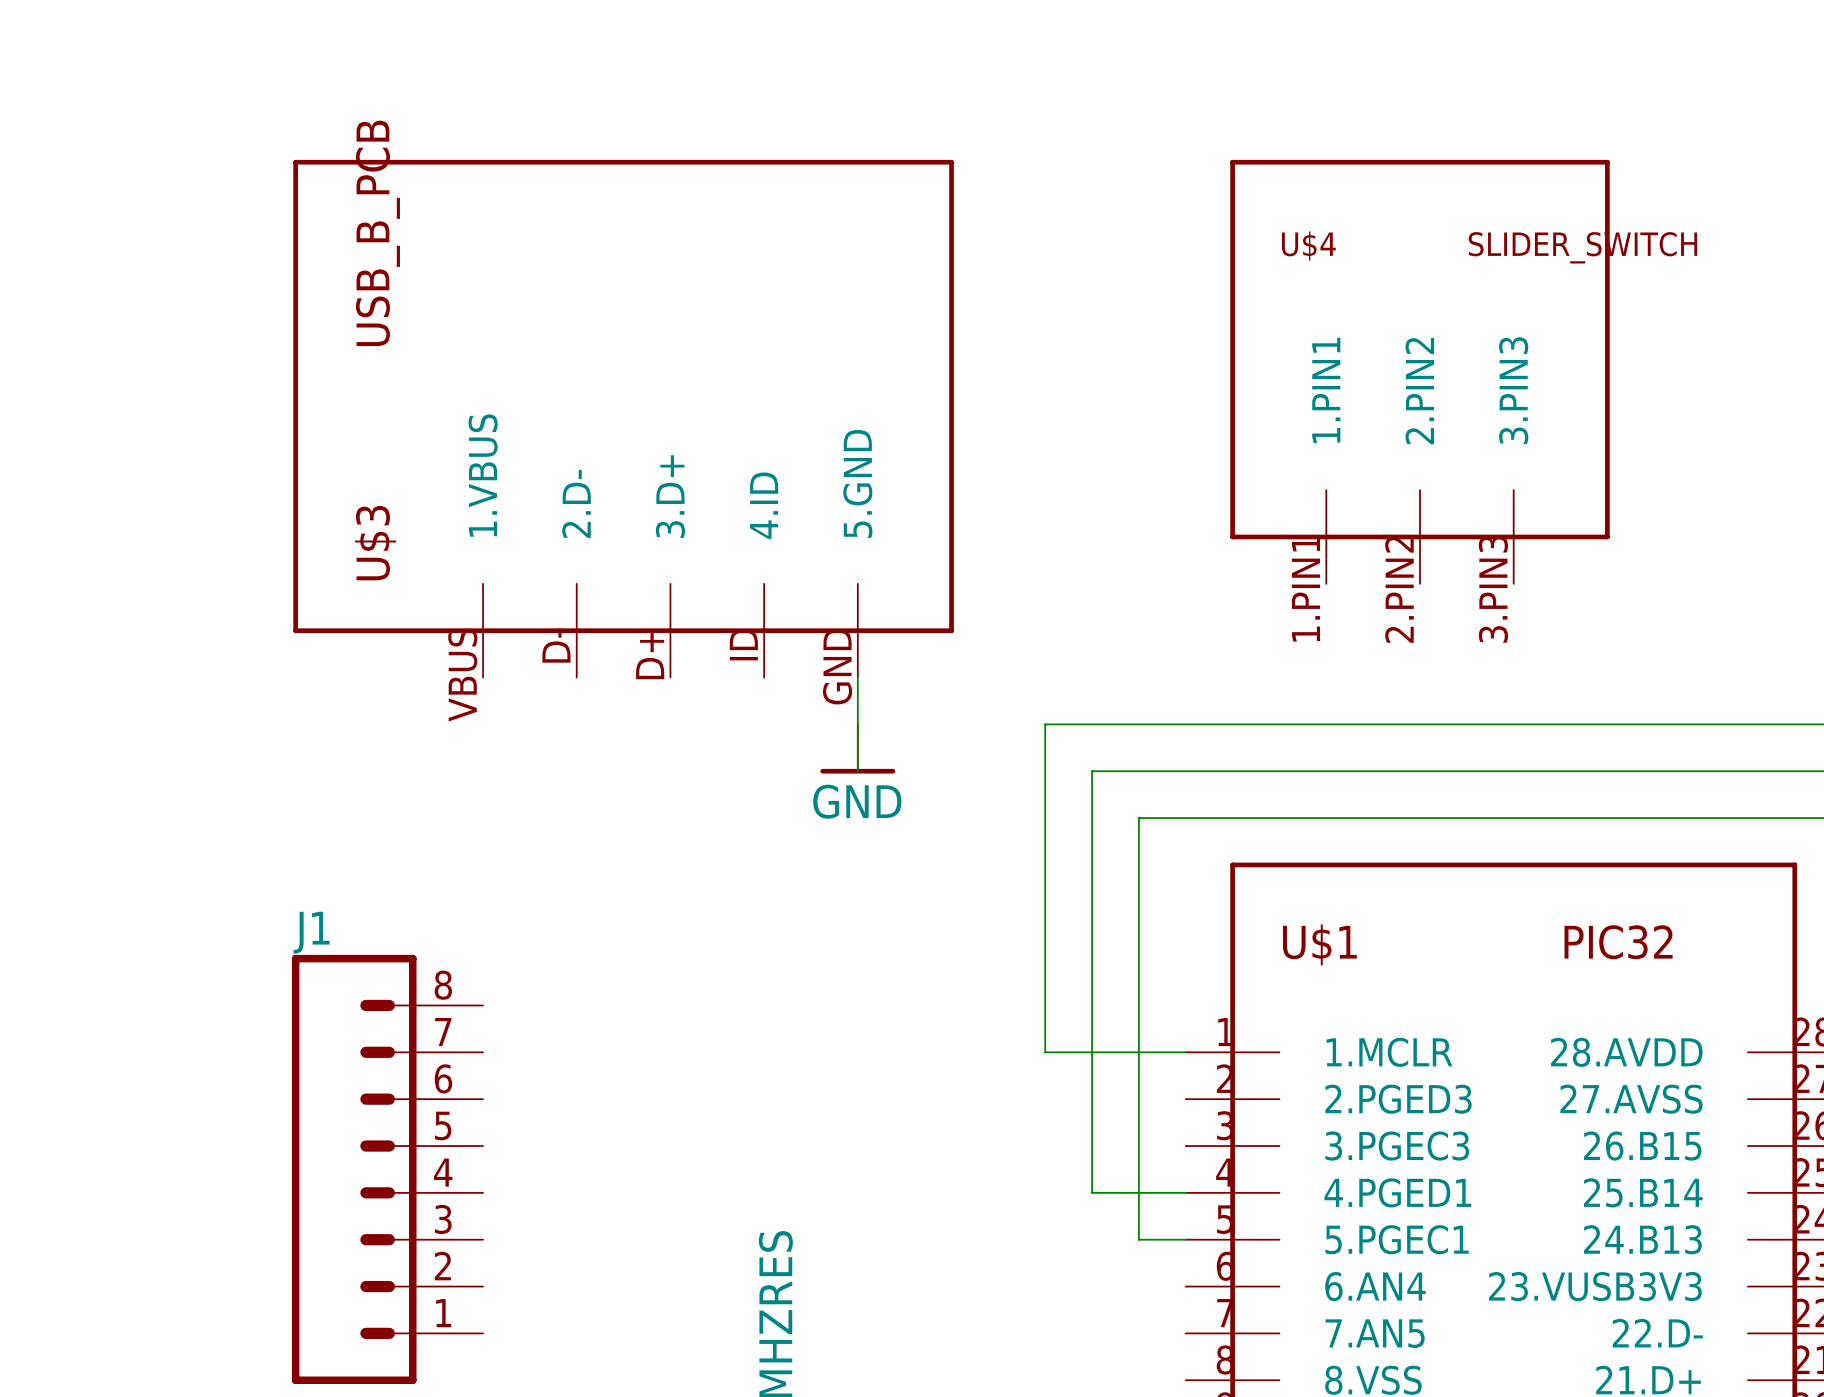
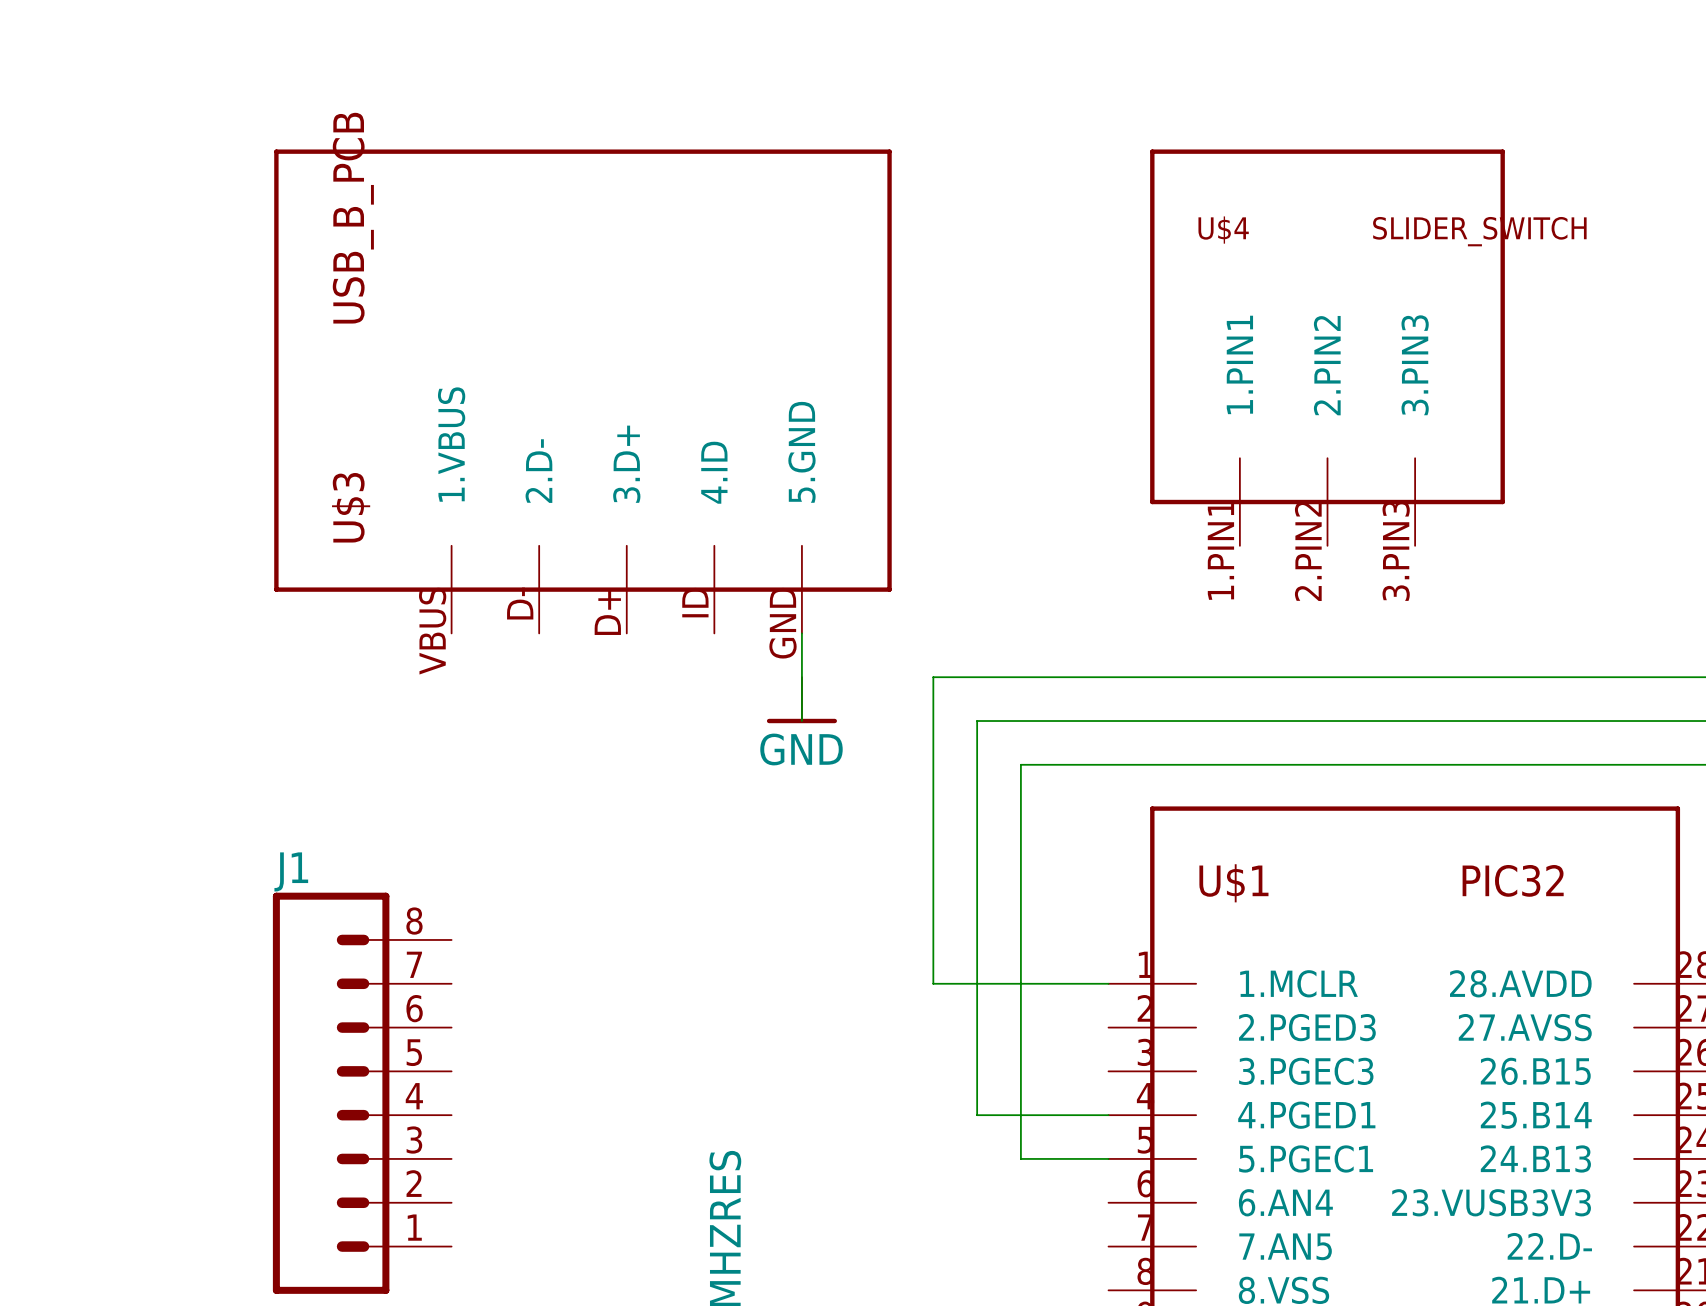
wire: (1045, 724) (1045, 771) -> (1020, 721) (977, 721)
wire: (1092, 771) (1092, 818) -> (1064, 764) (1020, 764)
wire: (1138, 818) (1138, 1239) -> (977, 677) (933, 677) (933, 983) (977, 983) (977, 1115) (1020, 1115) (1020, 1158) (1064, 1158)

